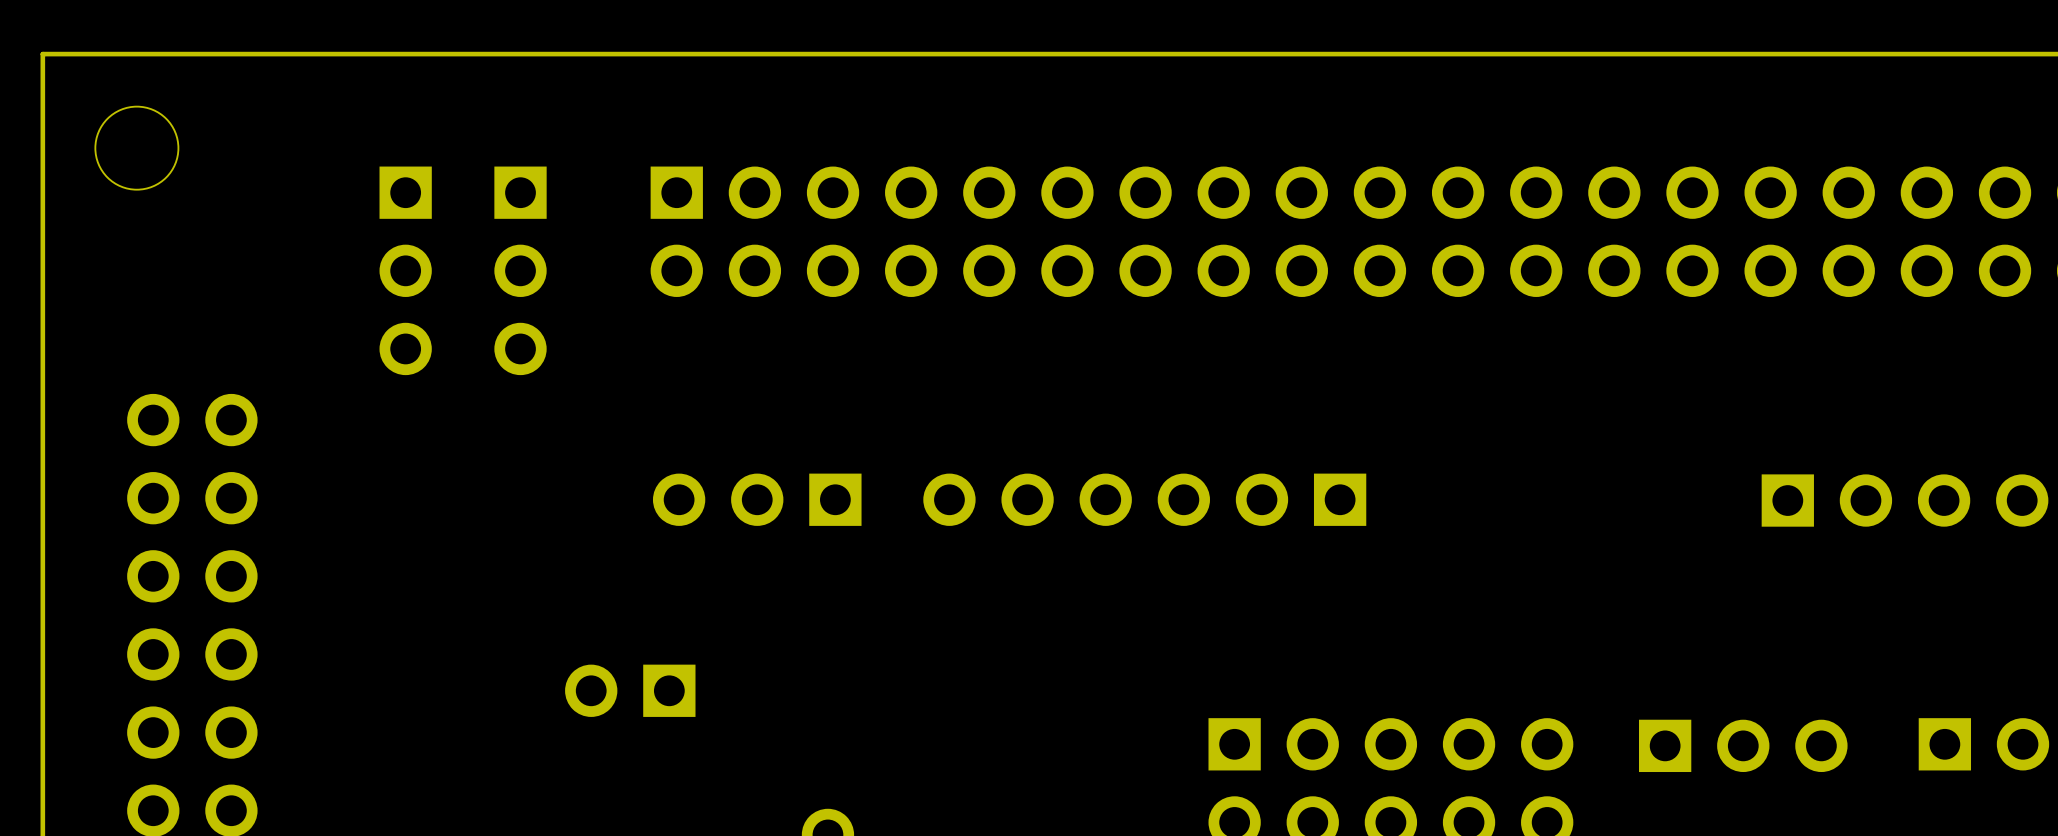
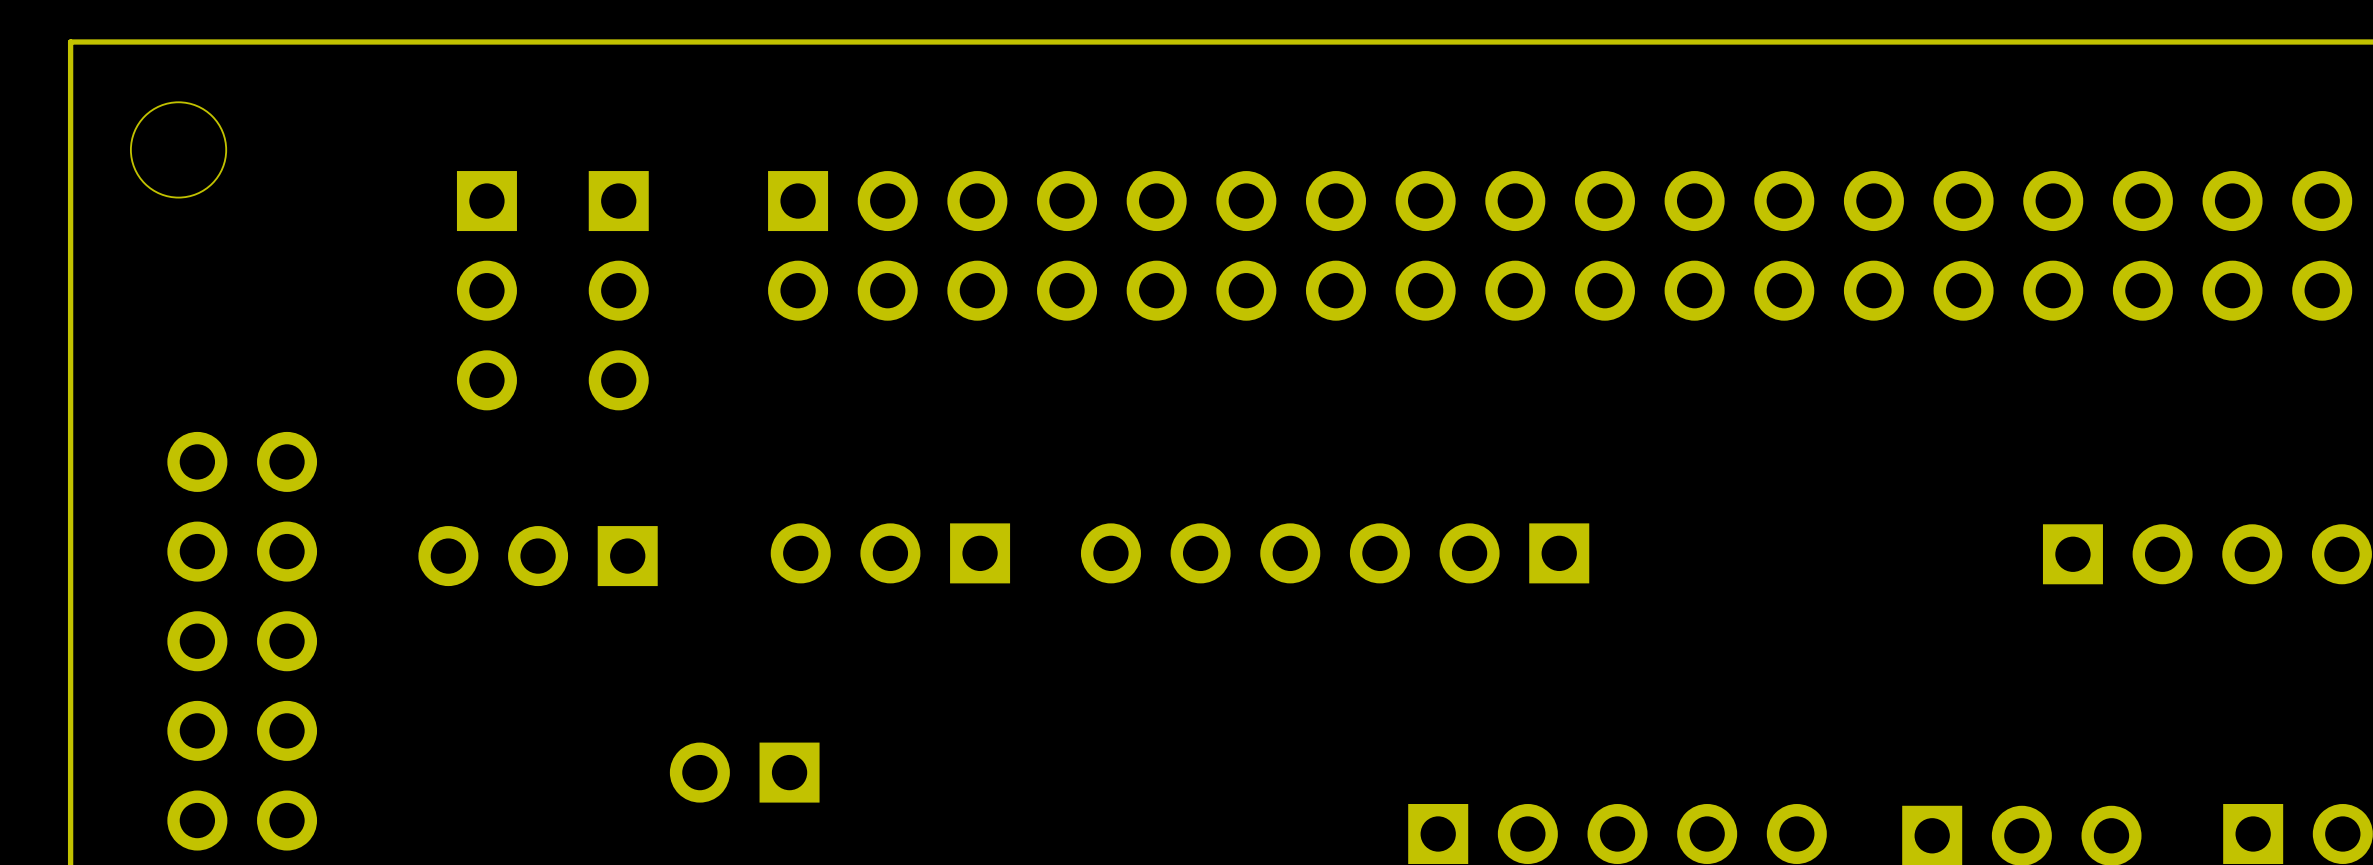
part: none -> (538, 556)

